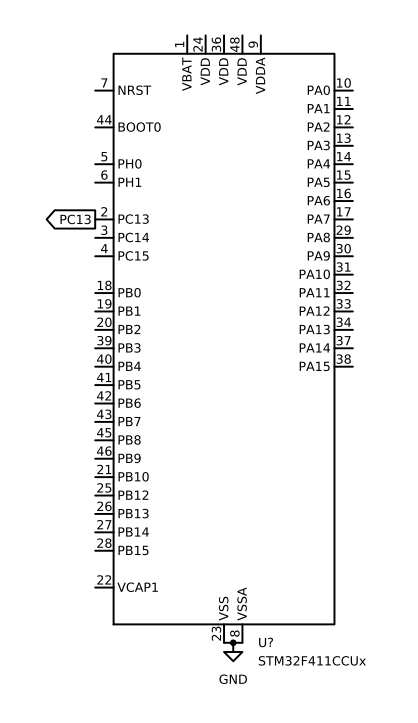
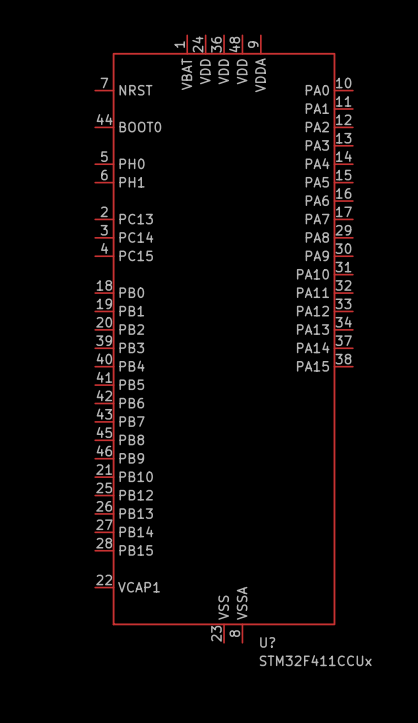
global label: PC13 (75, 219) -> none
wire: (224, 642) (242, 642) -> none
junction: (233, 642) -> none
power symbol: GND (233, 651) -> none

